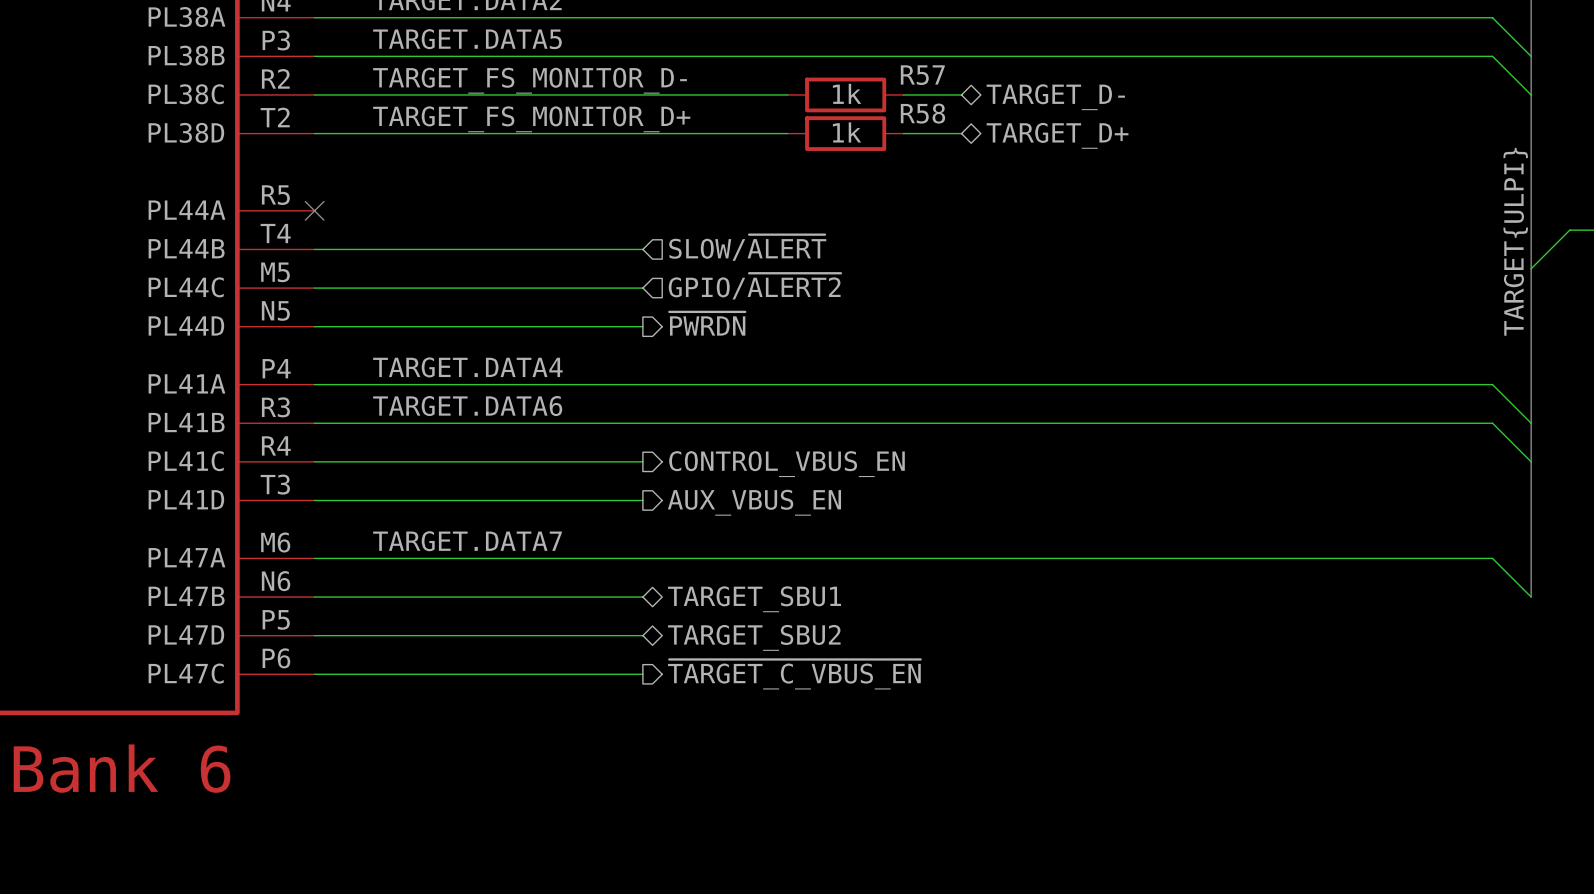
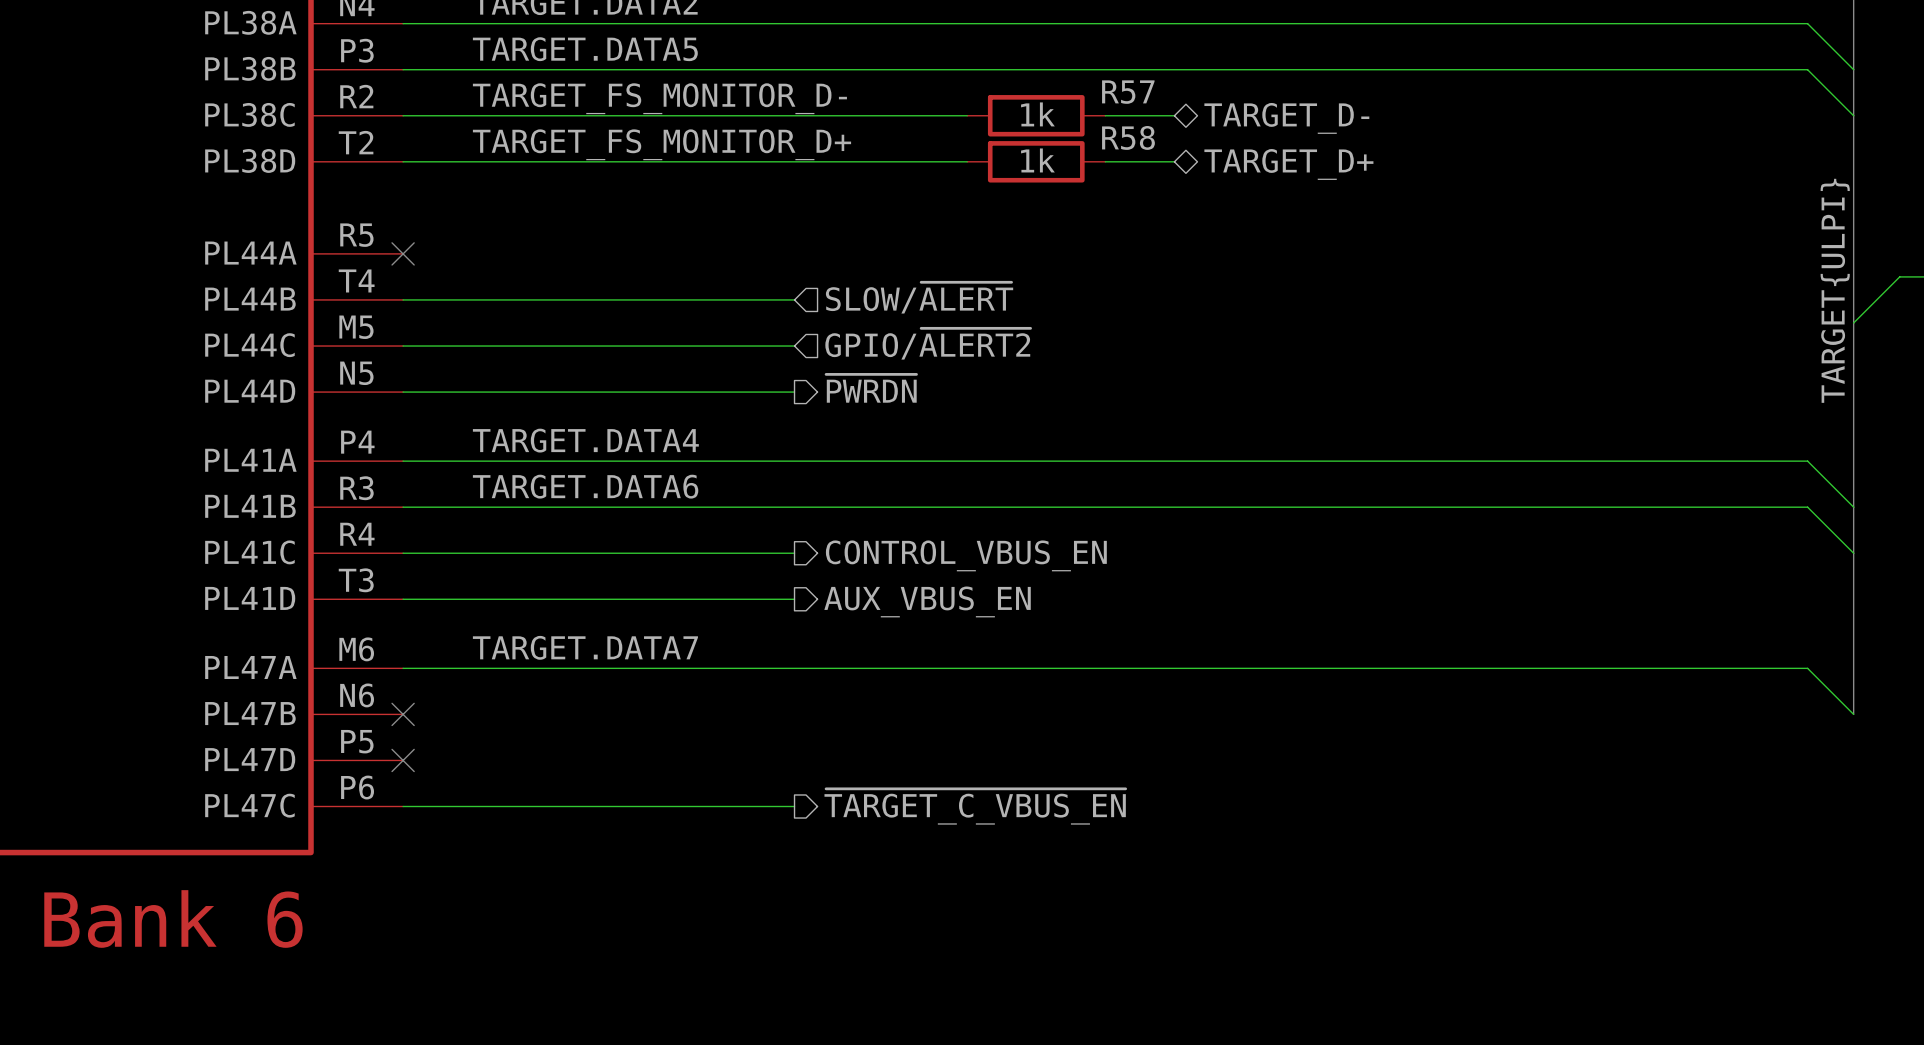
wire: (314, 597) (642, 597) -> none
no-connect mark: none -> (403, 714)
hierarchical label: TARGET_SBU1 (754, 599) -> none
wire: (314, 635) (642, 635) -> none
no-connect mark: none -> (403, 760)
hierarchical label: TARGET_SBU2 (754, 637) -> none

